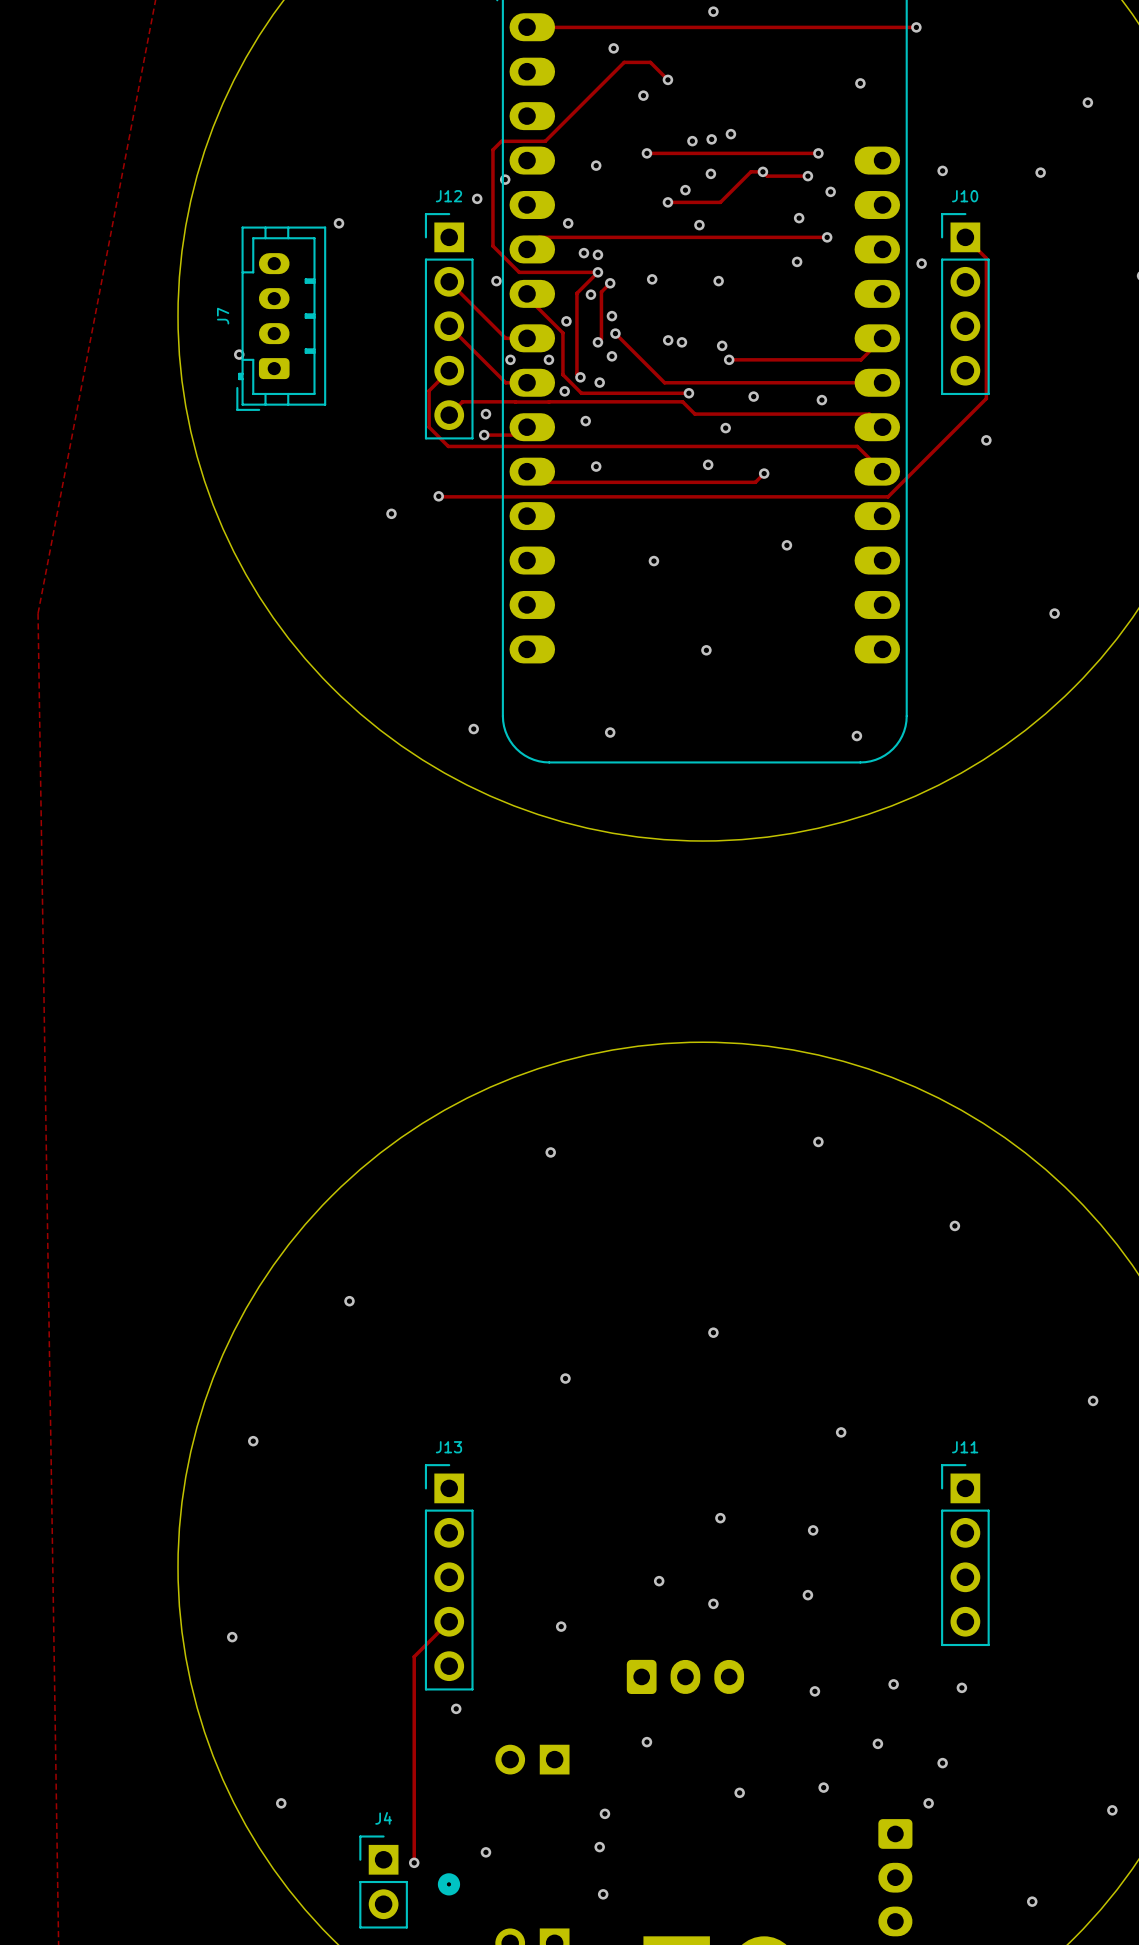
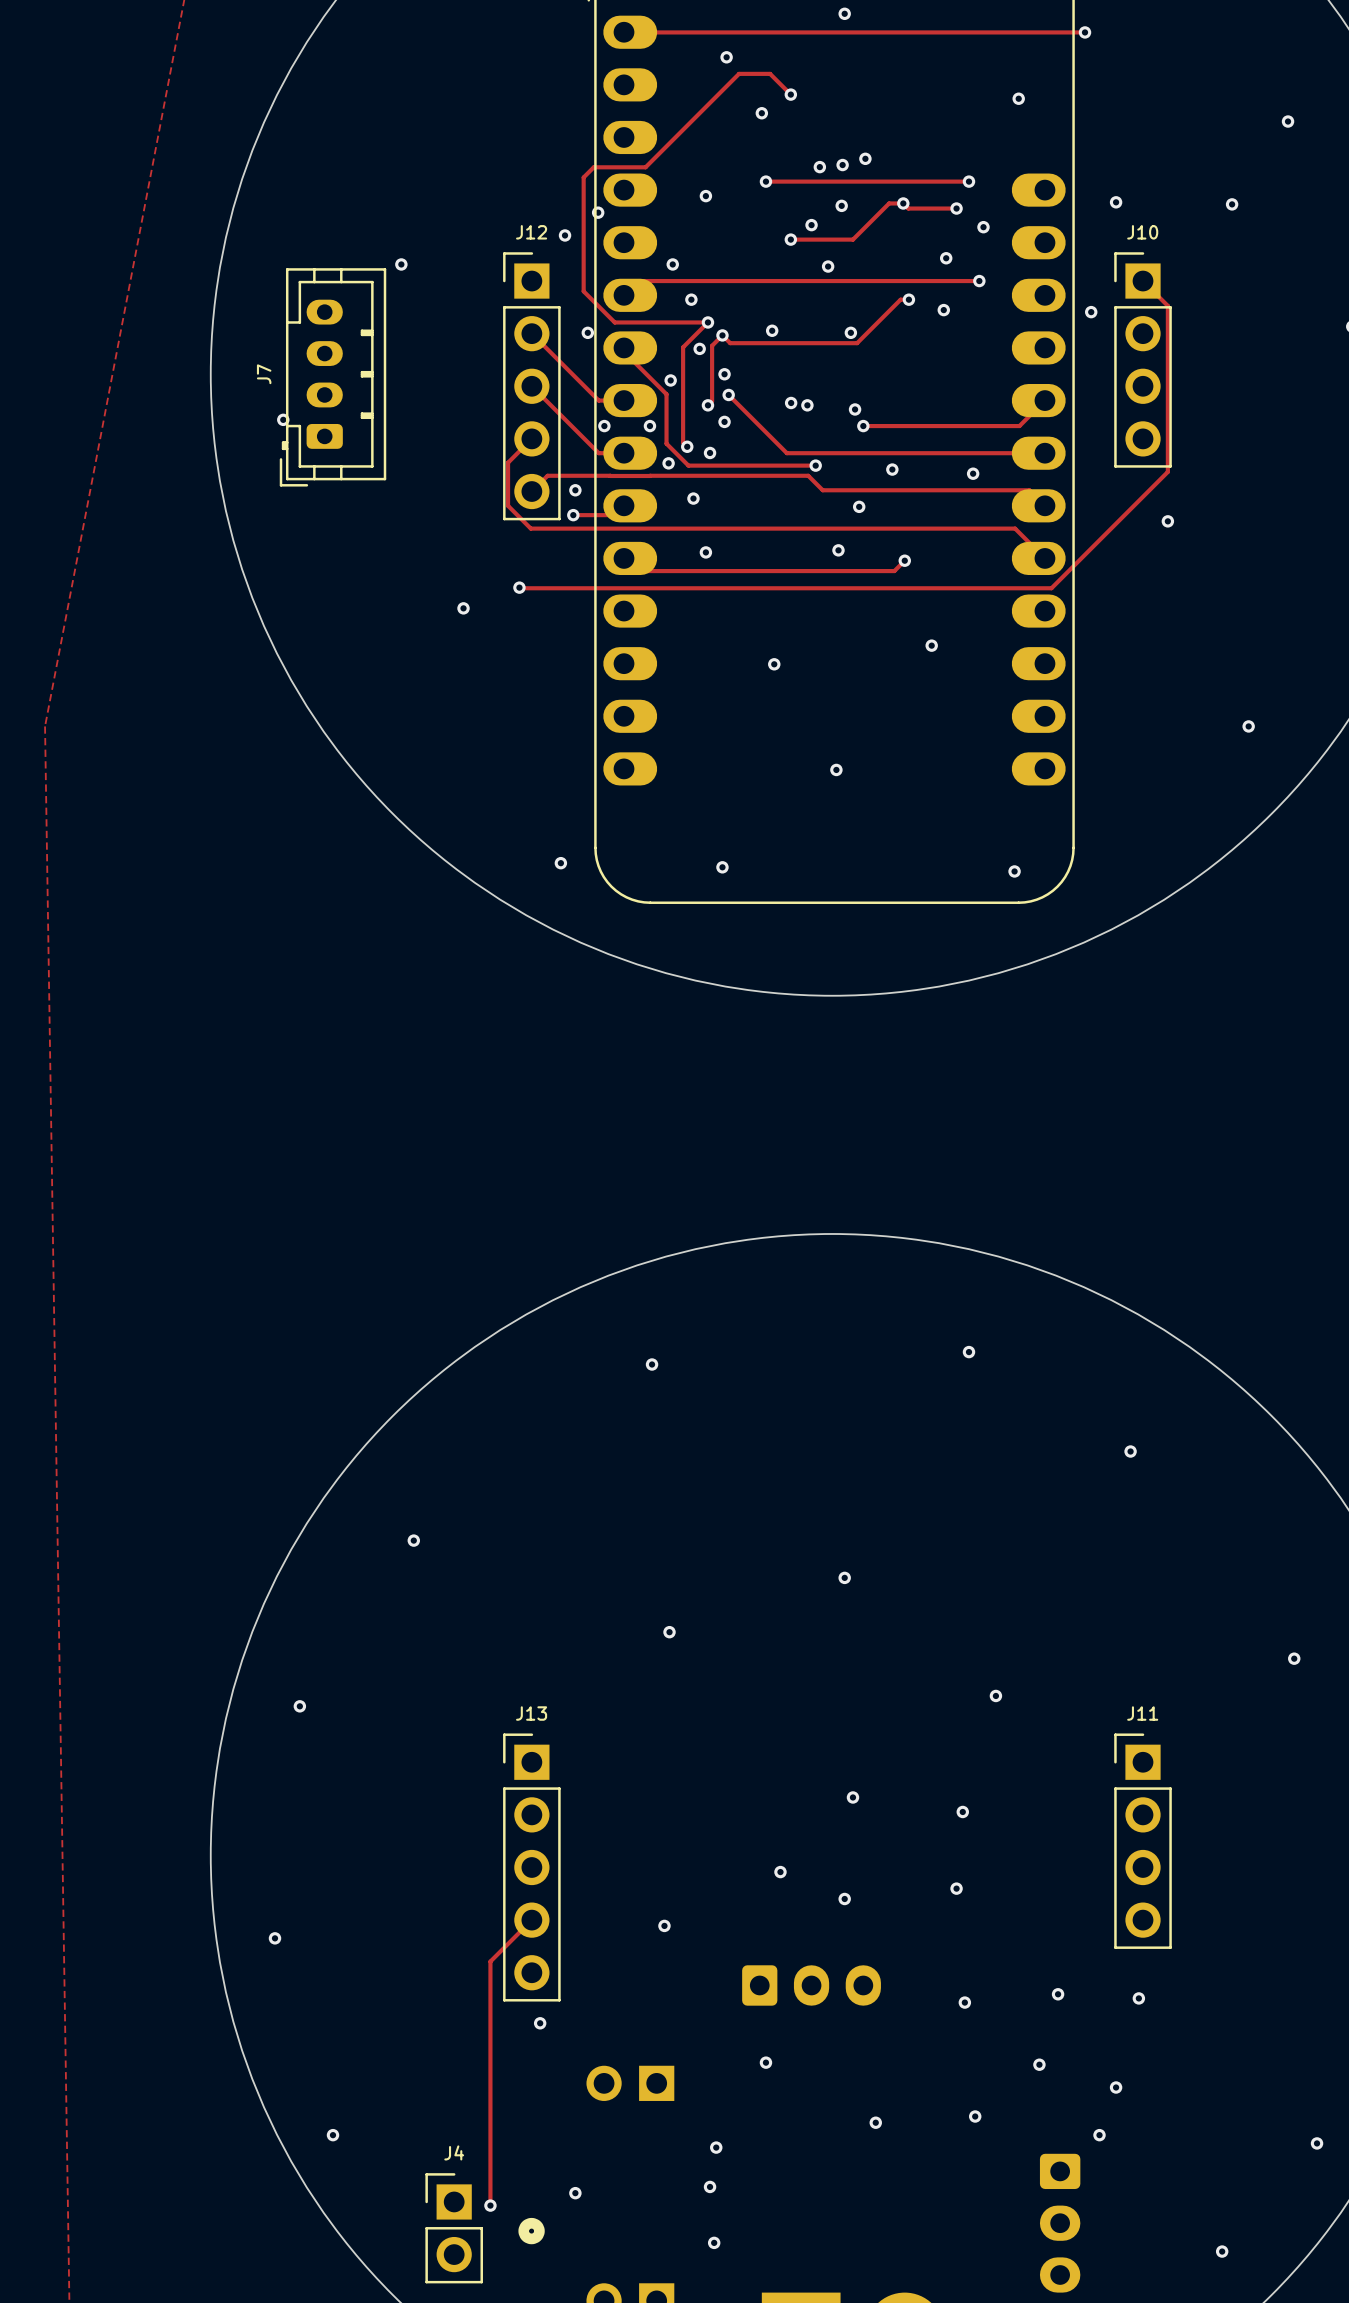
track: none -> (908, 299) (900, 299) (857, 343) (730, 343) (722, 335)
via: none -> (908, 299)
via: (597, 254) -> none

